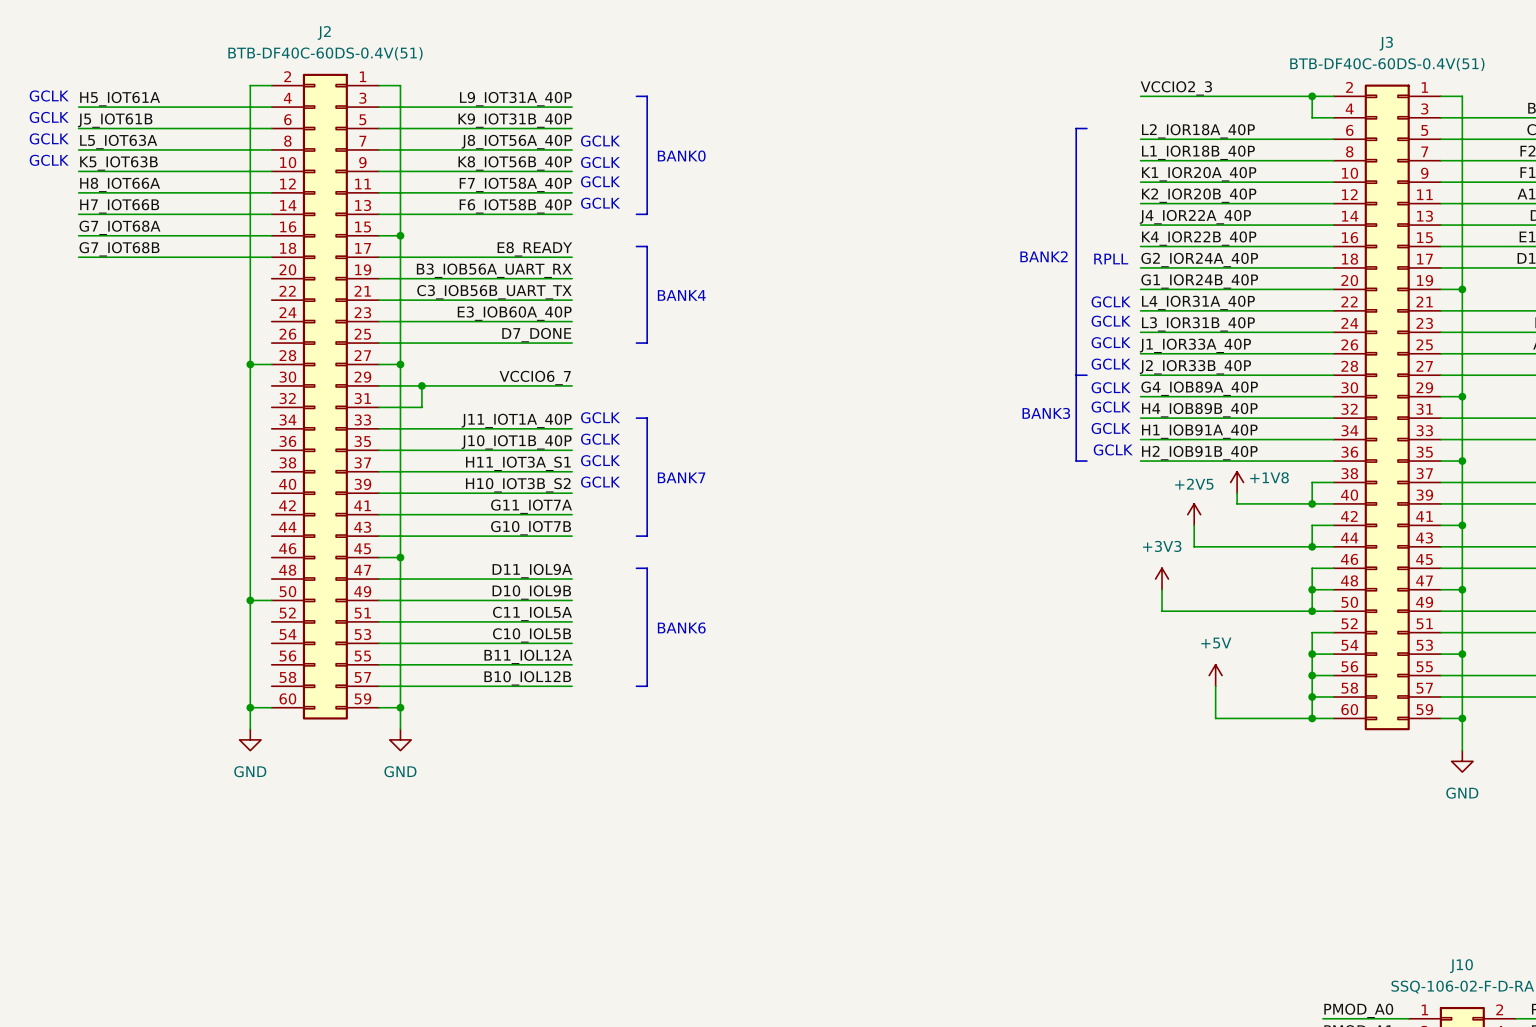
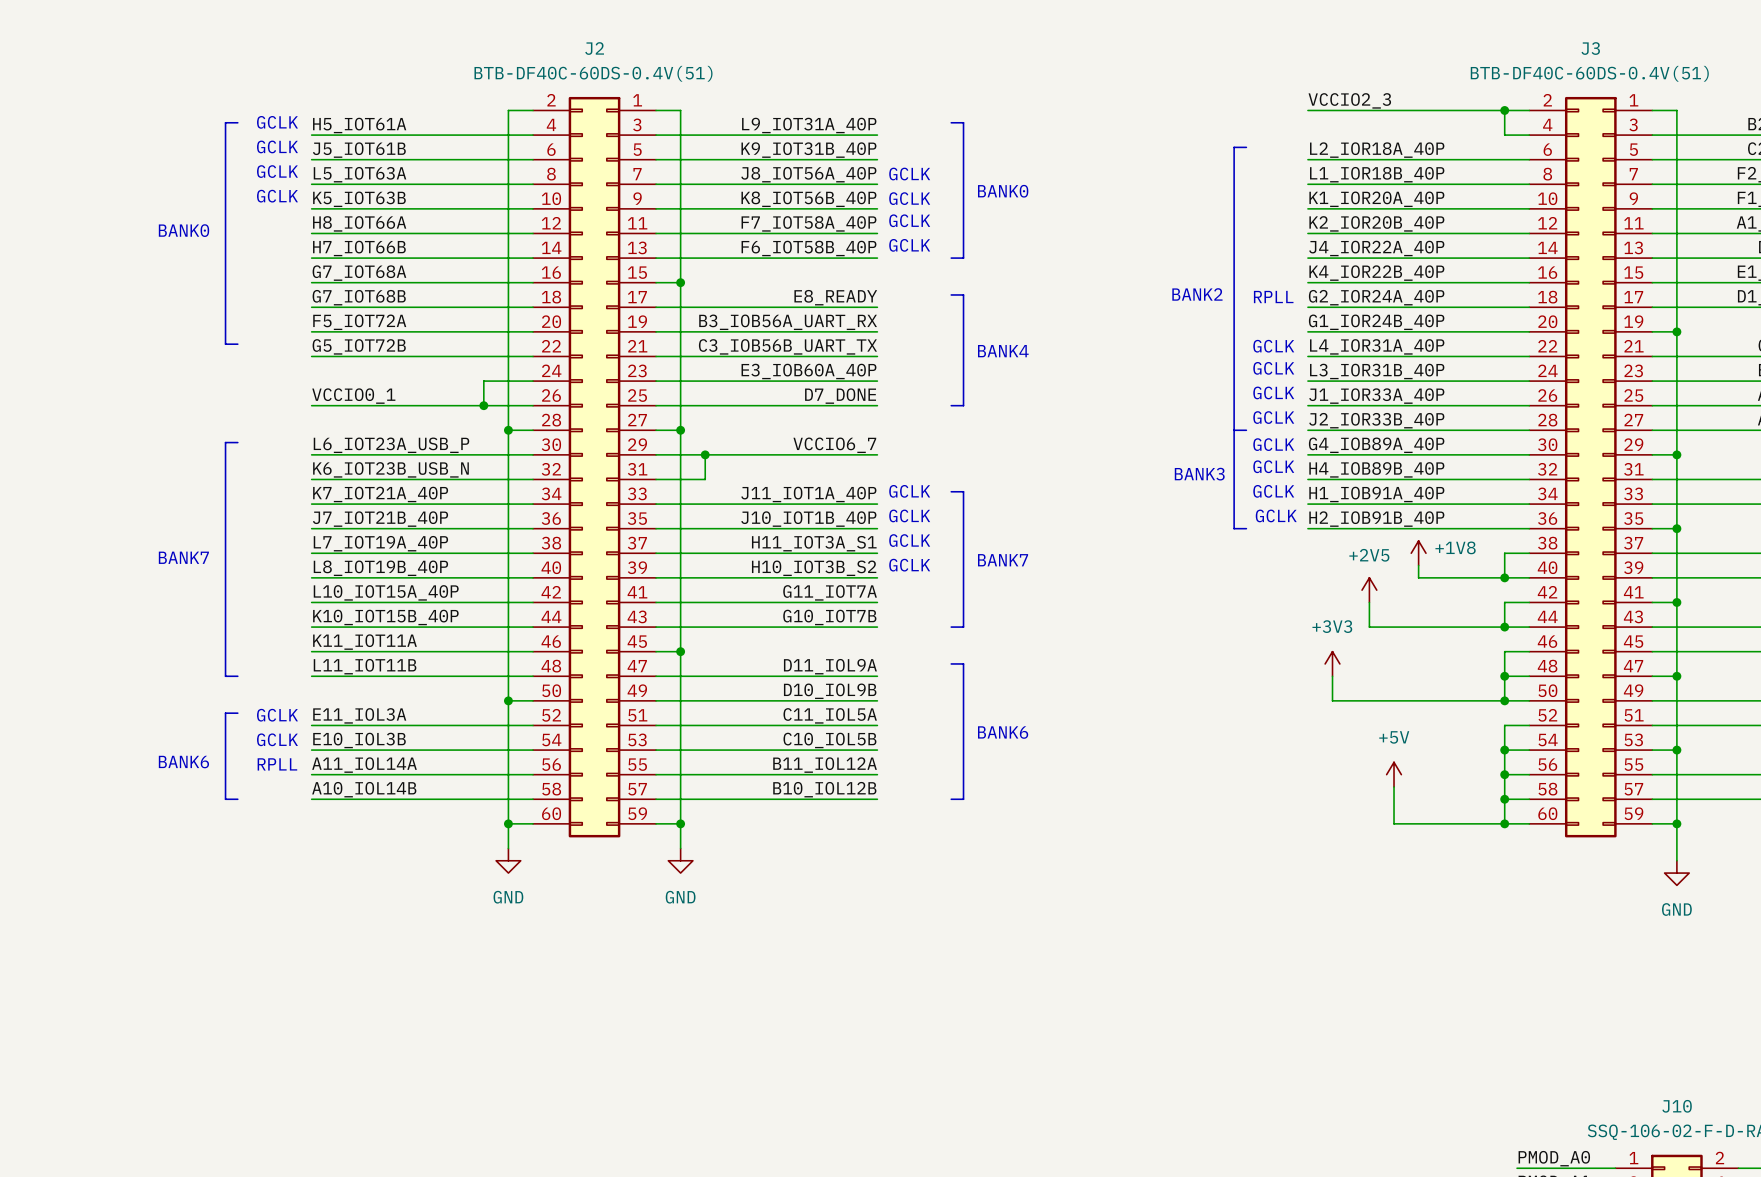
wire: (271, 85) (250, 85) (250, 729) -> (533, 110) (508, 110) (508, 848)
wire: (379, 85) (400, 85) (400, 729) -> (656, 110) (680, 110) (680, 848)
text: GCLK (49, 95) -> none
line: (636, 96) (647, 96) (647, 214) (636, 214) -> (951, 122) (963, 122) (963, 258) (951, 258)
label position: H5_IOT61A (120, 99) -> H5_IOT61A (359, 125)
label position: L9_IOT31A_40P (515, 99) -> L9_IOT31A_40P (809, 125)
text: none -> GCLK (277, 122)
wire: (78, 107) (271, 107) -> (311, 135) (533, 135)
line: none -> (237, 122) (225, 122) (225, 344) (237, 344)
wire: (379, 107) (572, 107) -> (656, 135) (877, 135)
text: GCLK (49, 117) -> none
label position: J5_IOT61B (115, 120) -> J5_IOT61B (359, 150)
label position: K9_IOT31B_40P (515, 120) -> K9_IOT31B_40P (808, 150)
wire: (78, 128) (271, 128) -> (311, 159) (533, 159)
text: none -> GCLK (277, 146)
wire: (379, 128) (572, 128) -> (656, 159) (877, 159)
text: GCLK (49, 138) -> none
text: GCLK (600, 141) -> none
label position: L5_IOT63A (118, 142) -> L5_IOT63A (360, 174)
label position: J8_IOT56A_40P (516, 142) -> J8_IOT56A_40P (808, 174)
wire: (78, 149) (271, 149) -> (311, 184) (533, 184)
text: none -> GCLK (277, 171)
wire: (379, 149) (572, 149) -> (656, 184) (877, 184)
text: none -> GCLK (909, 174)
text position: BANK0 (681, 156) -> BANK0 (1003, 191)
text: GCLK (49, 160) -> none
text: GCLK (600, 162) -> none
label position: K5_IOT63B (118, 163) -> K5_IOT63B (359, 199)
label position: K8_IOT56B_40P (515, 163) -> K8_IOT56B_40P (808, 199)
wire: (78, 171) (271, 171) -> (311, 208) (533, 208)
text: none -> GCLK (277, 196)
wire: (379, 171) (572, 171) -> (656, 208) (877, 208)
text: none -> GCLK (909, 198)
text: GCLK (600, 181) -> none
label position: H8_IOT66A (120, 184) -> H8_IOT66A (359, 223)
label position: F7_IOT58A_40P (515, 184) -> F7_IOT58A_40P (808, 223)
wire: (78, 192) (271, 192) -> (311, 233) (533, 233)
wire: (379, 192) (572, 192) -> (656, 233) (877, 233)
text: none -> GCLK (909, 220)
text: none -> BANK0 (184, 230)
text: GCLK (600, 203) -> none
label position: H7_IOT66B (119, 206) -> H7_IOT66B (359, 248)
label position: F6_IOT58B_40P (515, 206) -> F6_IOT58B_40P (808, 248)
text: none -> GCLK (909, 245)
wire: (78, 214) (271, 214) -> (311, 258) (533, 258)
wire: (379, 214) (572, 214) -> (656, 258) (877, 258)
label position: G7_IOT68A (119, 227) -> G7_IOT68A (359, 273)
wire: (78, 235) (271, 235) -> (311, 282) (533, 282)
wire: (379, 235) (400, 235) -> (656, 282) (680, 282)
junction: (400, 235) -> none
junction: none -> (680, 282)
line: (636, 246) (647, 246) (647, 343) (636, 343) -> (951, 294) (963, 294) (963, 405) (951, 405)
label position: G7_IOT68B (119, 249) -> G7_IOT68B (359, 297)
label position: E8_READY (534, 249) -> E8_READY (835, 297)
wire: (78, 257) (271, 257) -> (311, 307) (533, 307)
wire: (379, 257) (572, 257) -> (656, 307) (877, 307)
label position: B3_IOB56A_UART_RX (494, 270) -> B3_IOB56A_UART_RX (788, 322)
wire: (379, 278) (572, 278) -> (656, 331) (877, 331)
label: none -> F5_IOT72A (359, 322)
wire: none -> (311, 331) (533, 331)
label position: C3_IOB56B_UART_TX (494, 292) -> C3_IOB56B_UART_TX (787, 346)
text position: BANK4 (681, 295) -> BANK4 (1003, 351)
wire: (379, 300) (572, 300) -> (656, 356) (877, 356)
label: none -> G5_IOT72B (359, 346)
wire: none -> (311, 356) (533, 356)
label position: E3_IOB60A_40P (514, 313) -> E3_IOB60A_40P (808, 371)
wire: (379, 321) (572, 321) -> (656, 381) (877, 381)
wire: none -> (533, 381) (483, 381) (483, 405)
label position: D7_DONE (536, 335) -> D7_DONE (840, 396)
wire: (379, 343) (572, 343) -> (656, 405) (877, 405)
label: none -> VCCIO0_1 (353, 396)
wire: none -> (311, 405) (533, 405)
junction: none -> (483, 405)
wire: (250, 364) (271, 364) -> (508, 430) (533, 430)
junction: (250, 364) -> none
wire: (379, 364) (400, 364) -> (656, 430) (680, 430)
junction: (400, 364) -> none
junction: none -> (508, 430)
junction: none -> (680, 430)
label position: VCCIO6_7 (535, 378) -> VCCIO6_7 (834, 445)
line: none -> (237, 442) (225, 442) (225, 676) (237, 676)
wire: (379, 385) (572, 385) -> (656, 454) (877, 454)
wire: (421, 385) (421, 407) (379, 407) -> (705, 454) (705, 479) (656, 479)
junction: (421, 385) -> none
label: none -> L6_IOT23A_USB_P (391, 445)
wire: none -> (311, 454) (533, 454)
J2 position: (325, 396) -> (594, 467)
junction: none -> (705, 454)
label: none -> K6_IOT23B_USB_N (390, 469)
text: GCLK (600, 417) -> none
wire: none -> (311, 479) (533, 479)
line: (636, 418) (647, 418) (647, 536) (636, 536) -> (951, 491) (963, 491) (963, 627) (951, 627)
label position: J11_IOT1A_40P (516, 420) -> J11_IOT1A_40P (808, 494)
wire: (379, 428) (572, 428) -> (656, 504) (877, 504)
text: none -> GCLK (909, 491)
label: none -> K7_IOT21A_40P (380, 494)
wire: none -> (311, 504) (533, 504)
text: GCLK (600, 439) -> none
label position: J10_IOT1B_40P (516, 442) -> J10_IOT1B_40P (808, 519)
text: none -> GCLK (909, 515)
wire: (379, 450) (572, 450) -> (656, 528) (877, 528)
label: none -> J7_IOT21B_40P (380, 519)
text: GCLK (600, 460) -> none
wire: none -> (311, 528) (533, 528)
label position: H11_IOT3A_S1 (518, 463) -> H11_IOT3A_S1 (814, 543)
wire: (379, 471) (572, 471) -> (656, 553) (877, 553)
text: none -> GCLK (909, 540)
label: none -> L7_IOT19A_40P (380, 543)
text position: BANK7 (681, 477) -> BANK7 (1003, 560)
wire: none -> (311, 553) (533, 553)
text: GCLK (600, 482) -> none
label position: H10_IOT3B_S2 (518, 485) -> H10_IOT3B_S2 (814, 568)
text: none -> BANK7 (183, 557)
text: none -> GCLK (909, 565)
wire: (379, 493) (572, 493) -> (656, 577) (877, 577)
label: none -> L8_IOT19B_40P (380, 568)
wire: none -> (311, 577) (533, 577)
label position: G11_IOT7A (531, 506) -> G11_IOT7A (830, 592)
wire: (379, 514) (572, 514) -> (656, 602) (877, 602)
label: none -> L10_IOT15A_40P (386, 592)
wire: none -> (311, 602) (533, 602)
label position: G10_IOT7B (531, 528) -> G10_IOT7B (829, 617)
wire: (379, 536) (572, 536) -> (656, 627) (877, 627)
label: none -> K10_IOT15B_40P (385, 617)
wire: none -> (311, 627) (533, 627)
wire: (379, 557) (400, 557) -> (656, 651) (680, 651)
junction: (400, 557) -> none
label: none -> K11_IOT11A (364, 642)
wire: none -> (311, 651) (533, 651)
junction: none -> (680, 651)
line: (636, 568) (647, 568) (647, 686) (636, 686) -> (951, 663) (963, 663) (963, 799) (951, 799)
label position: D11_IOL9A (532, 571) -> D11_IOL9A (830, 666)
wire: (379, 579) (572, 579) -> (656, 676) (877, 676)
label: none -> L11_IOT11B (365, 666)
wire: none -> (311, 676) (533, 676)
label position: D10_IOL9B (531, 592) -> D10_IOL9B (830, 691)
wire: (250, 600) (271, 600) -> (508, 700) (533, 700)
junction: (250, 600) -> none
wire: (379, 600) (572, 600) -> (656, 700) (877, 700)
junction: none -> (508, 700)
label position: C11_IOL5A (532, 613) -> C11_IOL5A (830, 715)
line: none -> (237, 713) (225, 713) (225, 799) (237, 799)
wire: (379, 621) (572, 621) -> (656, 725) (877, 725)
text: none -> GCLK (277, 715)
label: none -> E11_IOL3A (359, 715)
text position: BANK6 (681, 627) -> BANK6 (1003, 732)
wire: none -> (311, 725) (533, 725)
label position: C10_IOL5B (532, 635) -> C10_IOL5B (829, 740)
wire: (379, 643) (572, 643) -> (656, 750) (877, 750)
text: none -> GCLK (277, 739)
label: none -> E10_IOL3B (359, 740)
wire: none -> (311, 750) (533, 750)
label position: B11_IOL12A (528, 656) -> B11_IOL12A (825, 765)
text: none -> BANK6 (183, 762)
wire: (379, 664) (572, 664) -> (656, 774) (877, 774)
text: none -> RPLL (277, 764)
label: none -> A11_IOL14A (364, 765)
wire: none -> (311, 774) (533, 774)
label position: B10_IOL12B (527, 678) -> B10_IOL12B (824, 789)
wire: (379, 686) (572, 686) -> (656, 799) (877, 799)
label: none -> A10_IOL14B (364, 789)
wire: none -> (311, 799) (533, 799)
wire: (250, 707) (271, 707) -> (508, 823) (533, 823)
junction: (250, 707) -> none
wire: (379, 707) (400, 707) -> (656, 823) (680, 823)
junction position: (400, 707) -> (508, 823)
junction: none -> (680, 823)
power symbol: GND (250, 739) -> none
power symbol position: GND (400, 739) -> GND (508, 860)
power symbol: none -> GND (680, 860)

